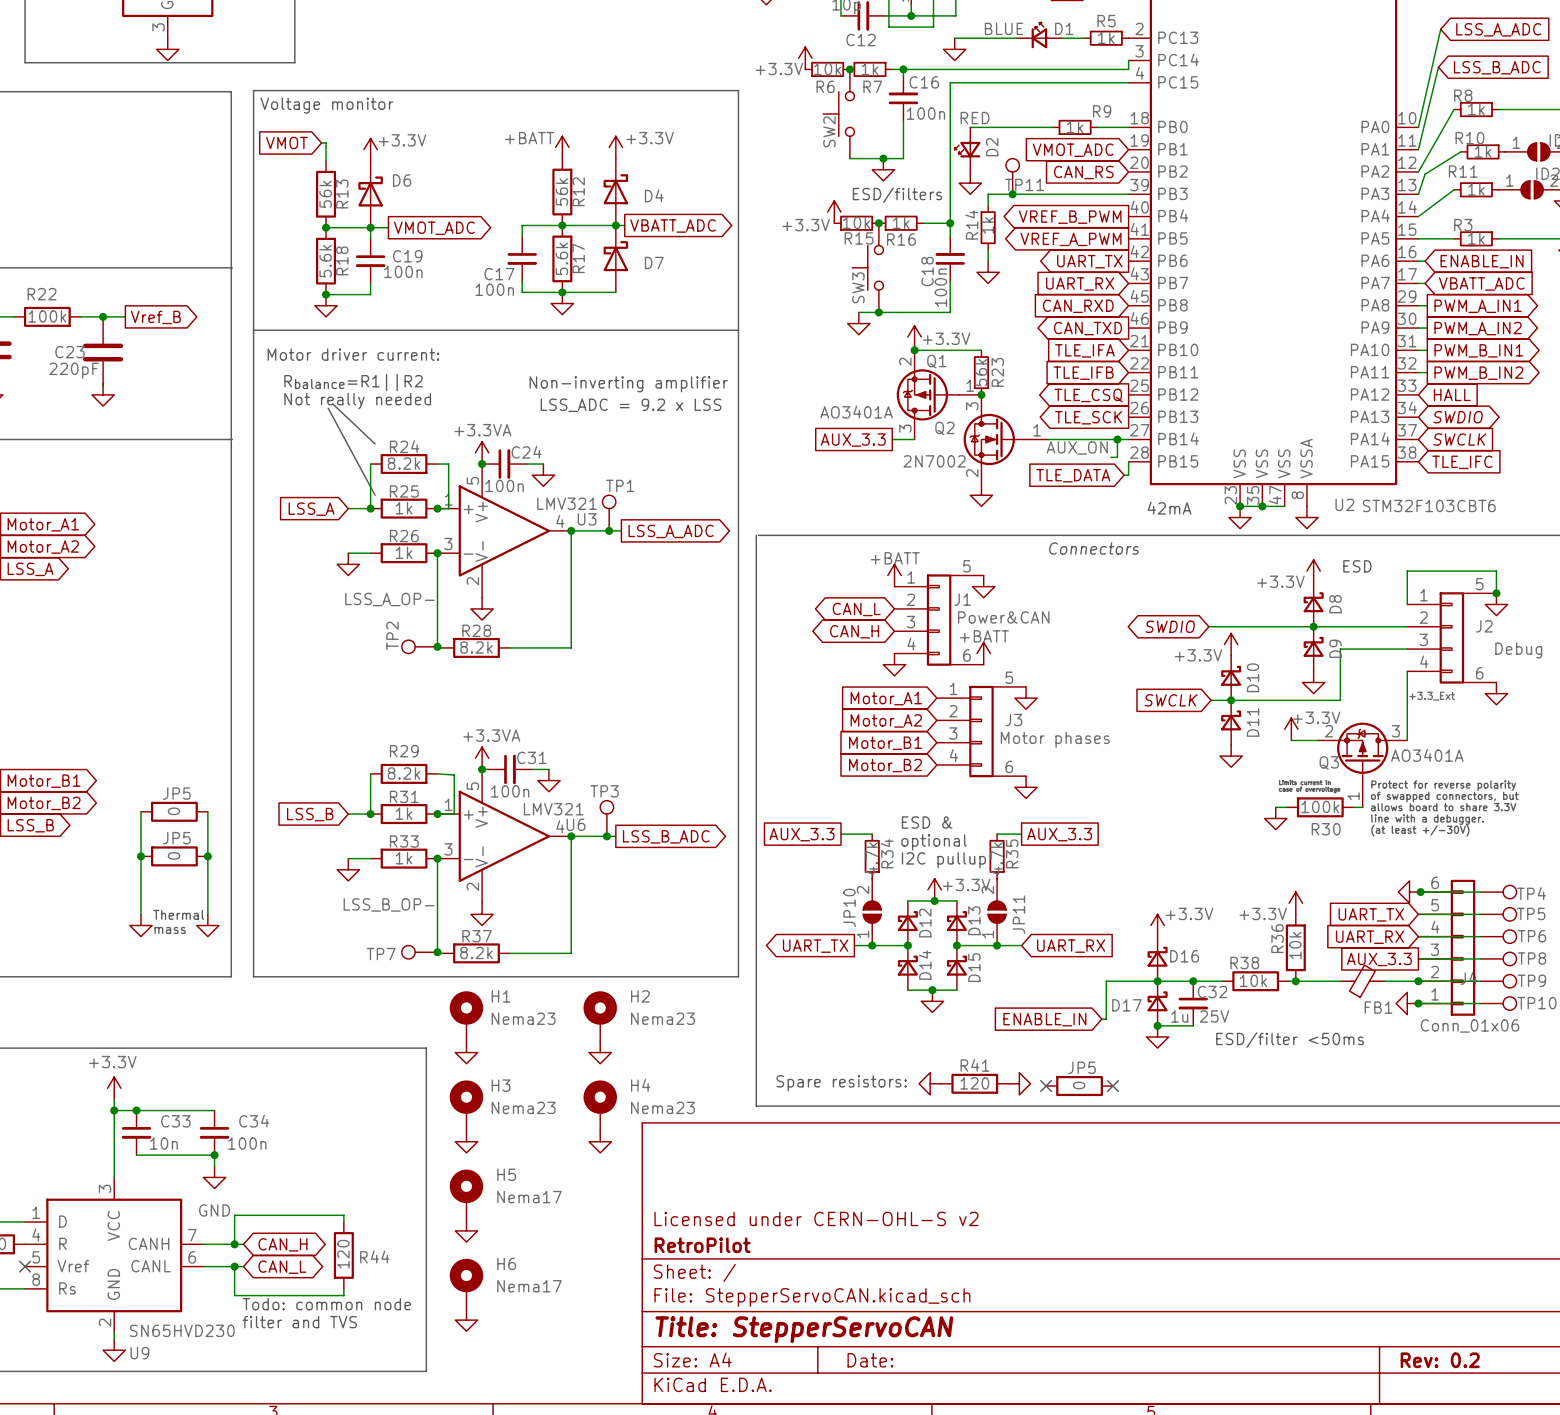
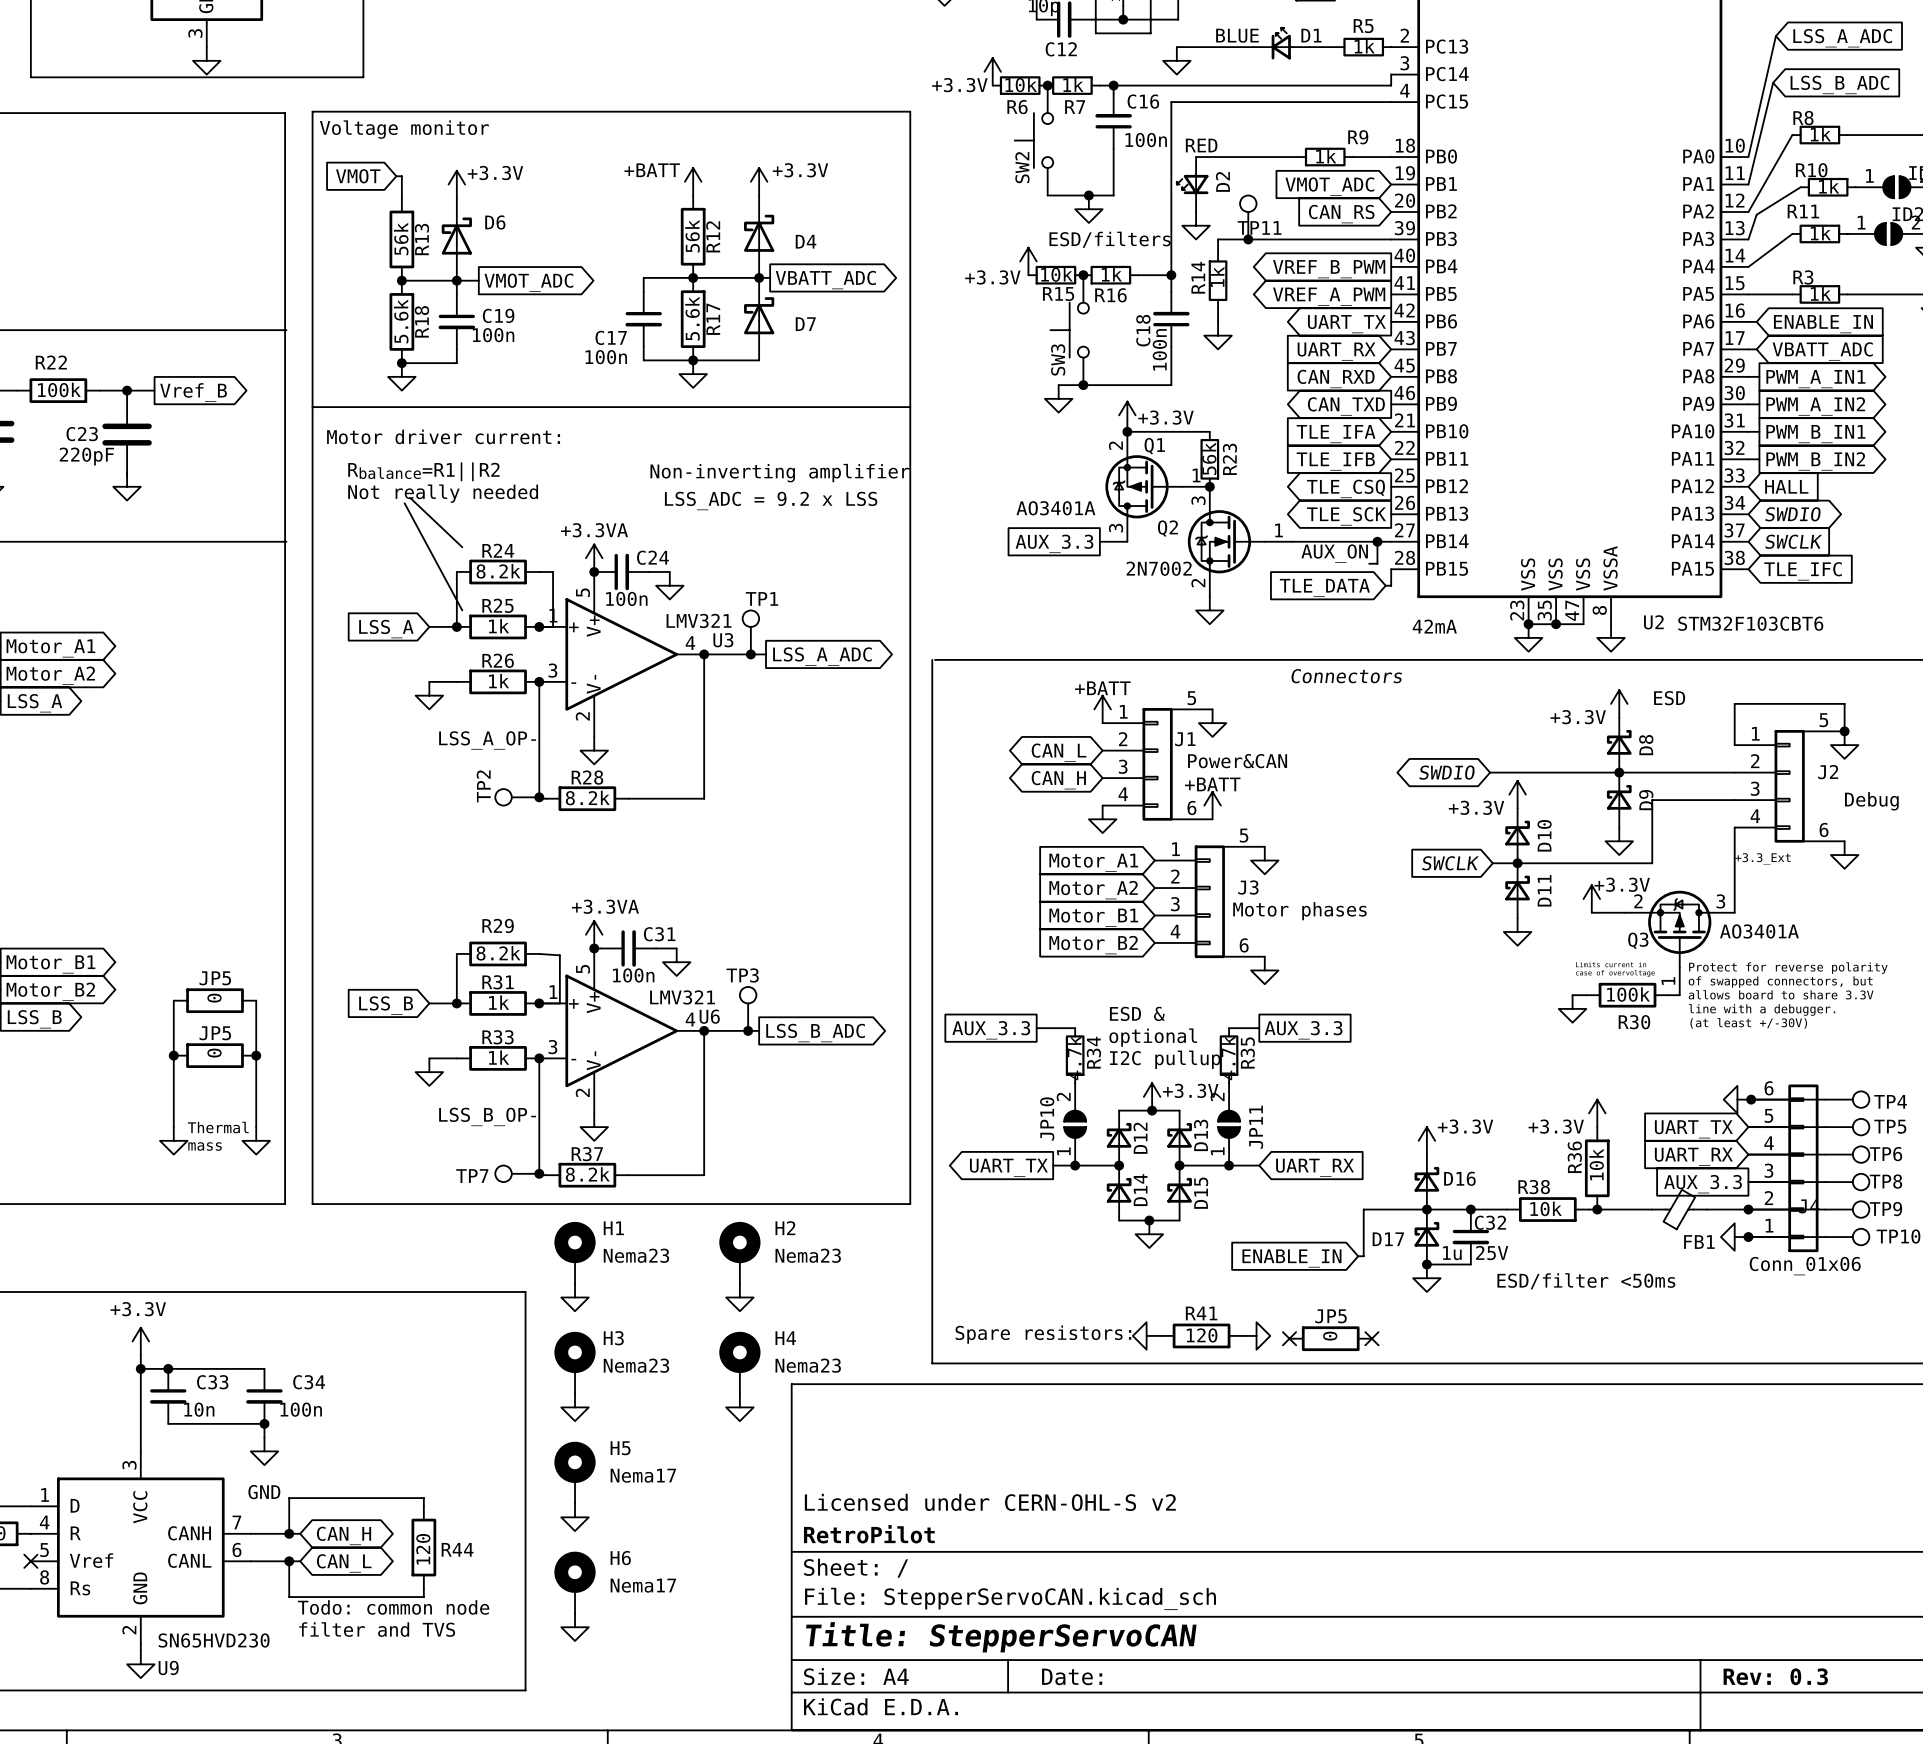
title block: Rev: 0.2 (1440, 1360) -> Rev: 0.3 (1775, 1676)

